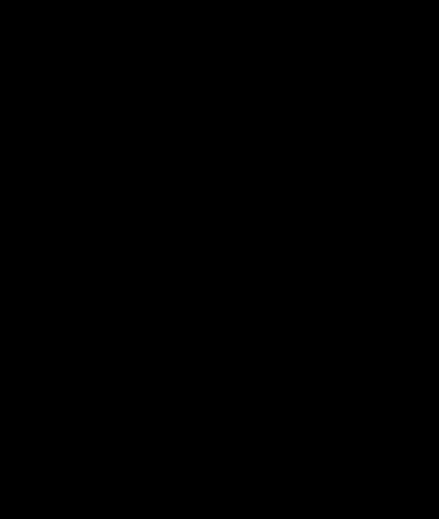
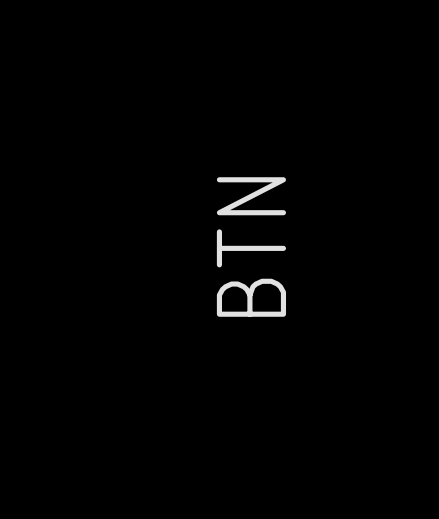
text: none -> BTN (251, 247)

